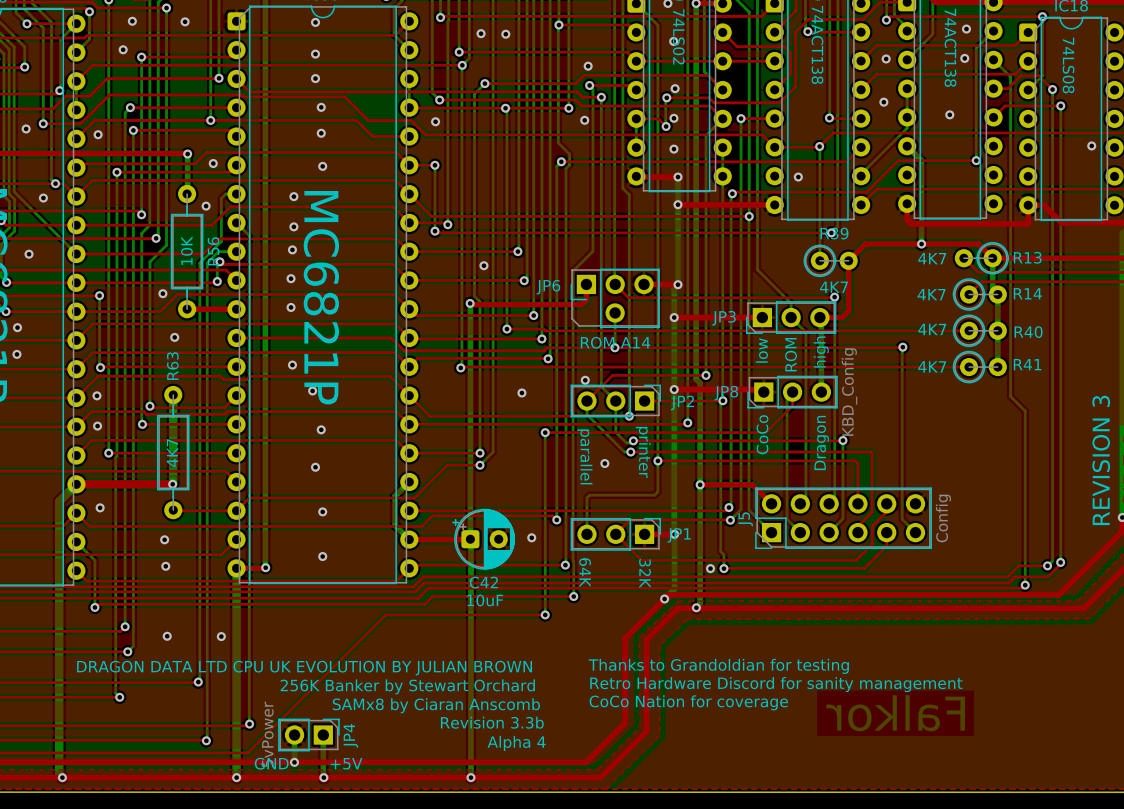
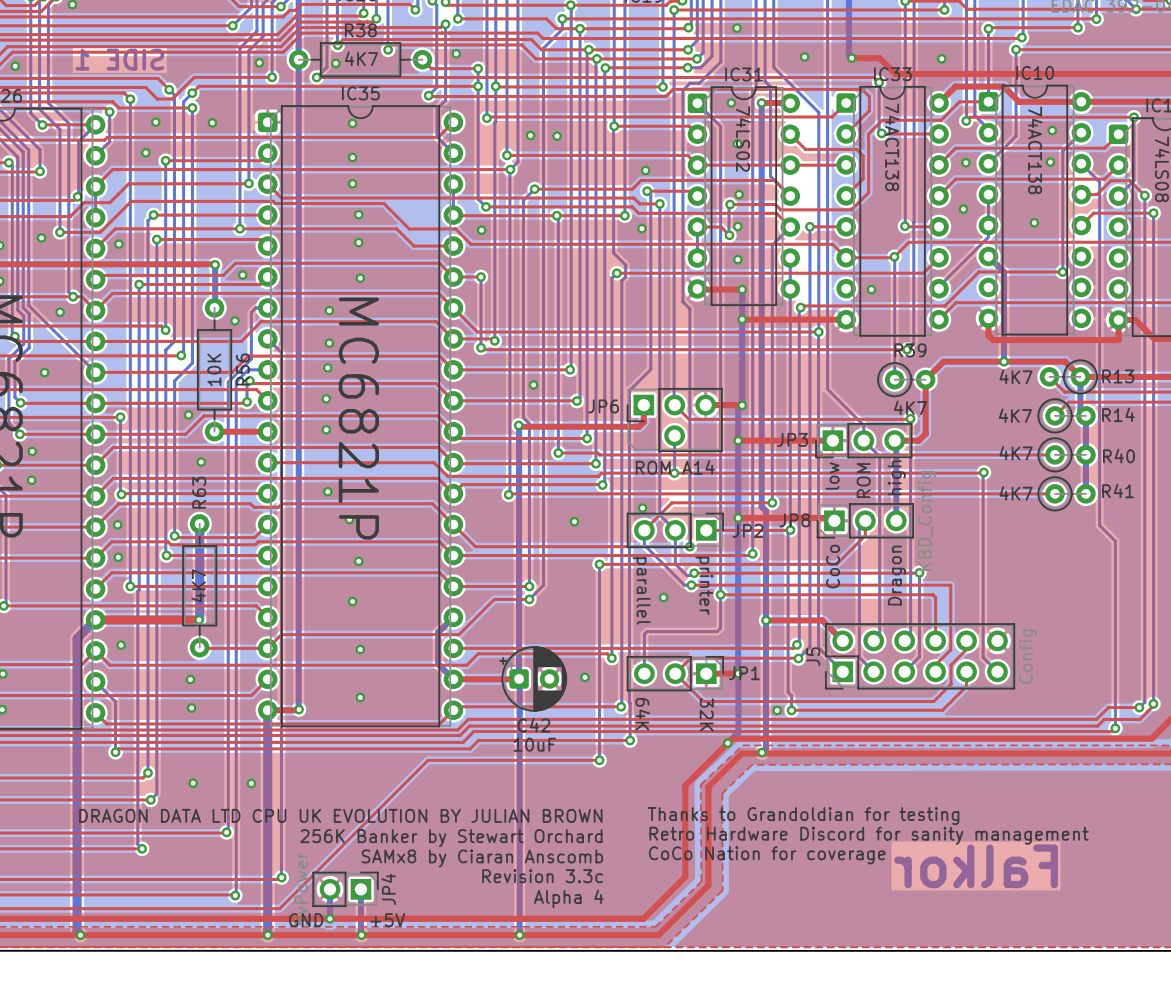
text: Revision 3.3b (492, 722) -> Revision 3.3c (542, 876)

